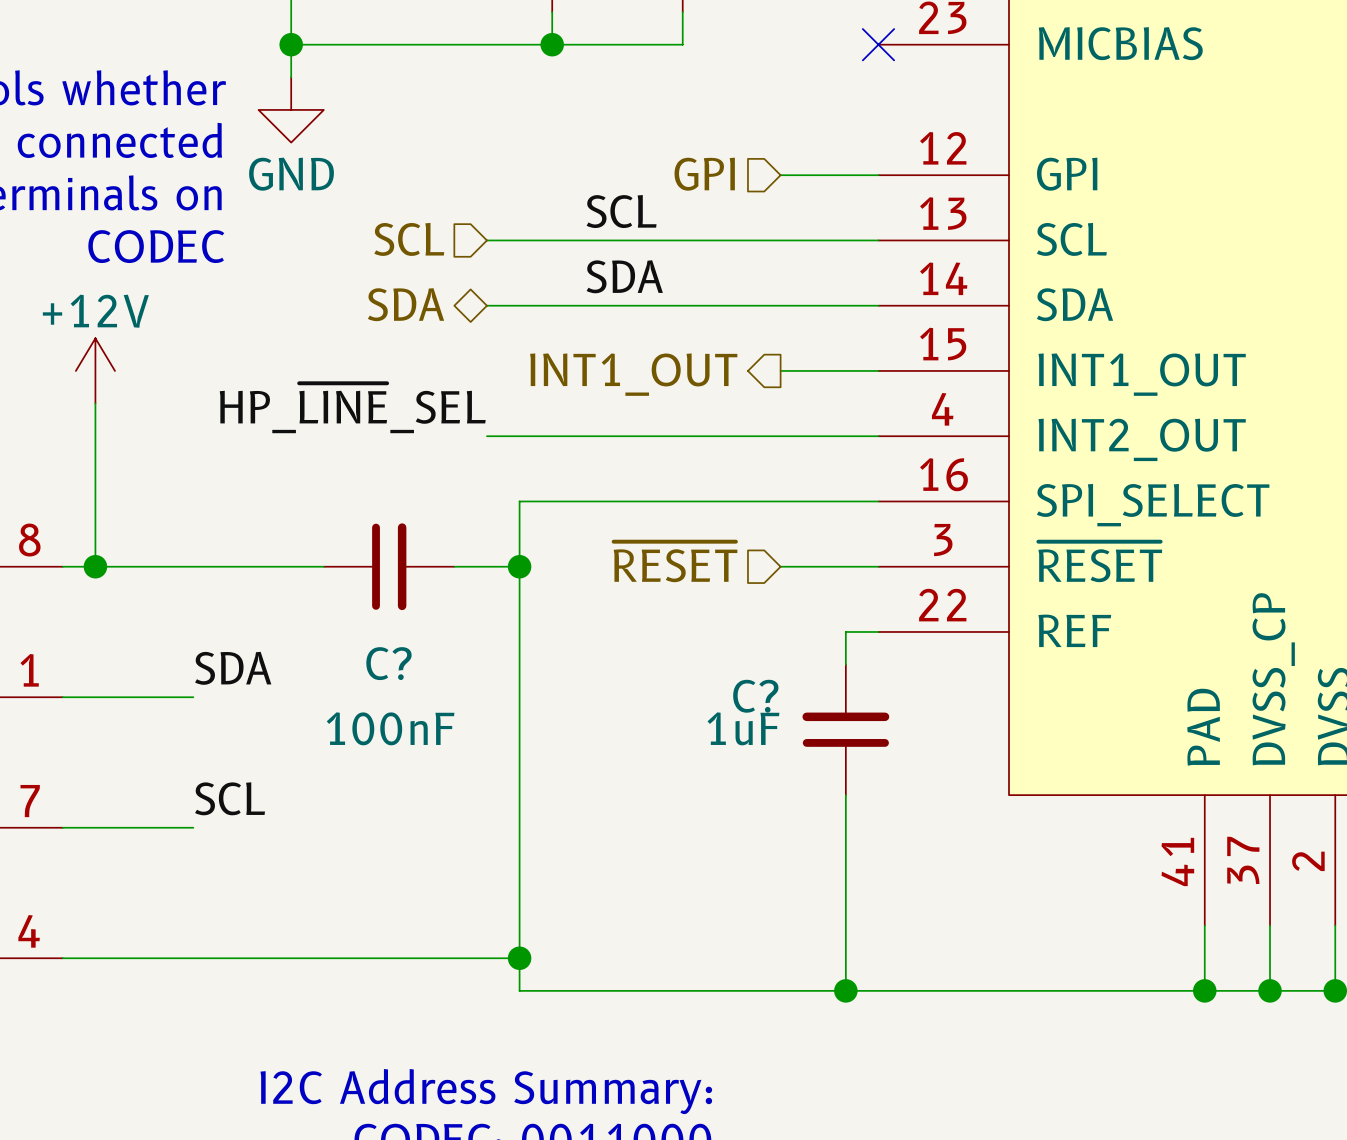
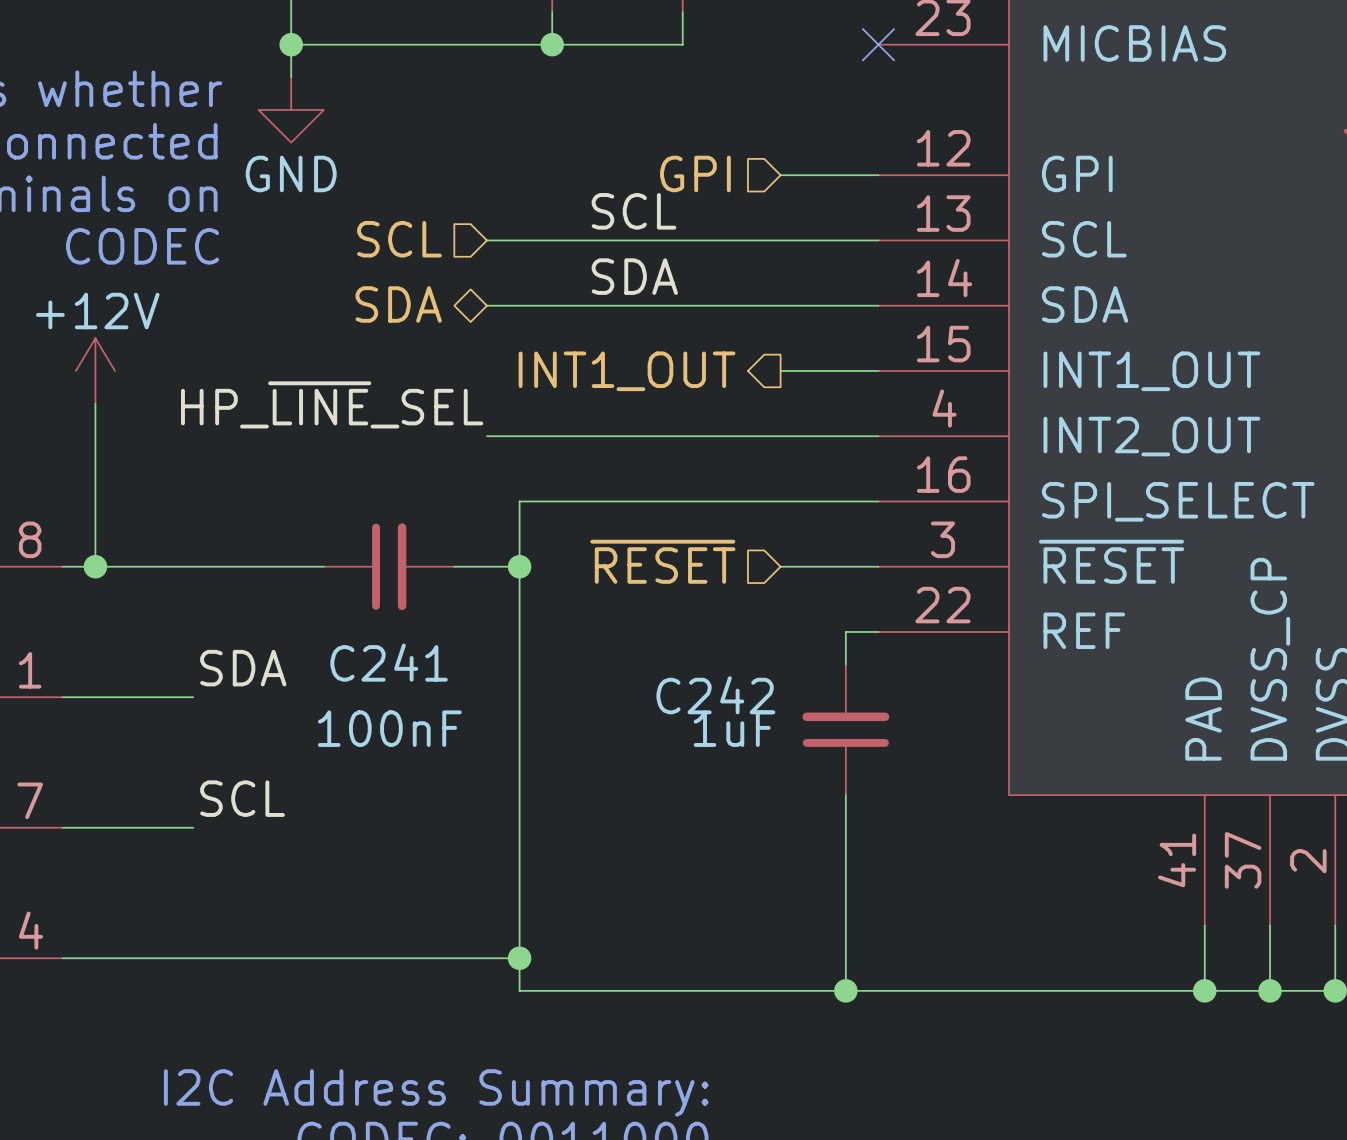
C? name: C? (388, 663) -> C241 (389, 662)
C? name: C? (755, 696) -> C242 (715, 695)

